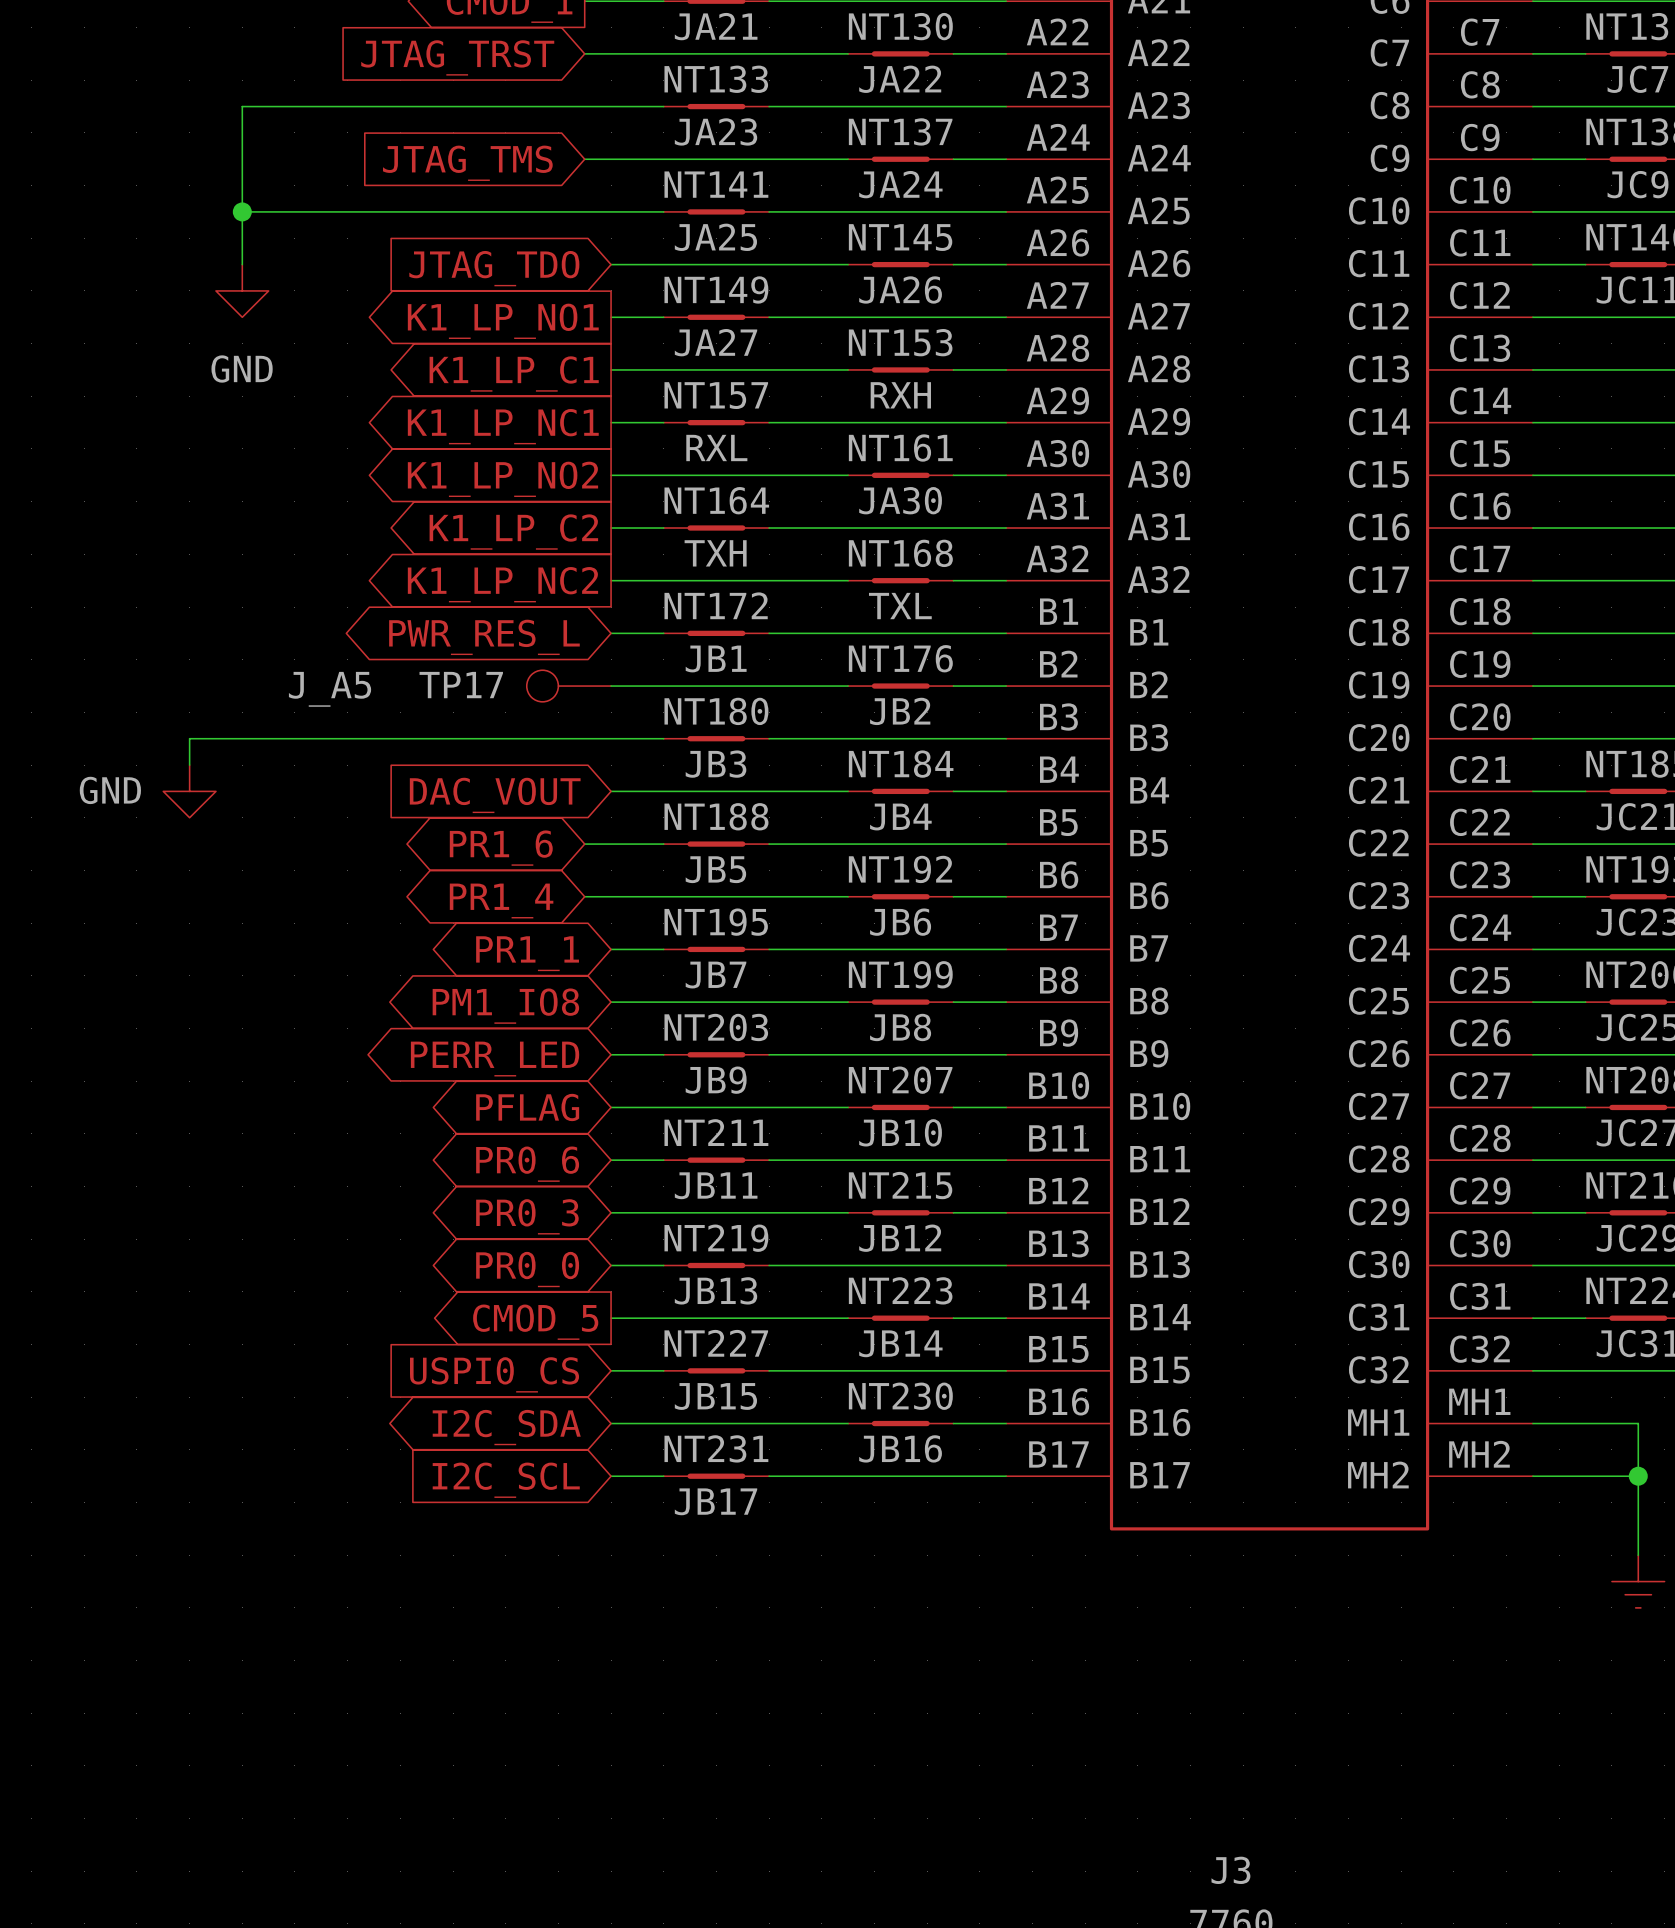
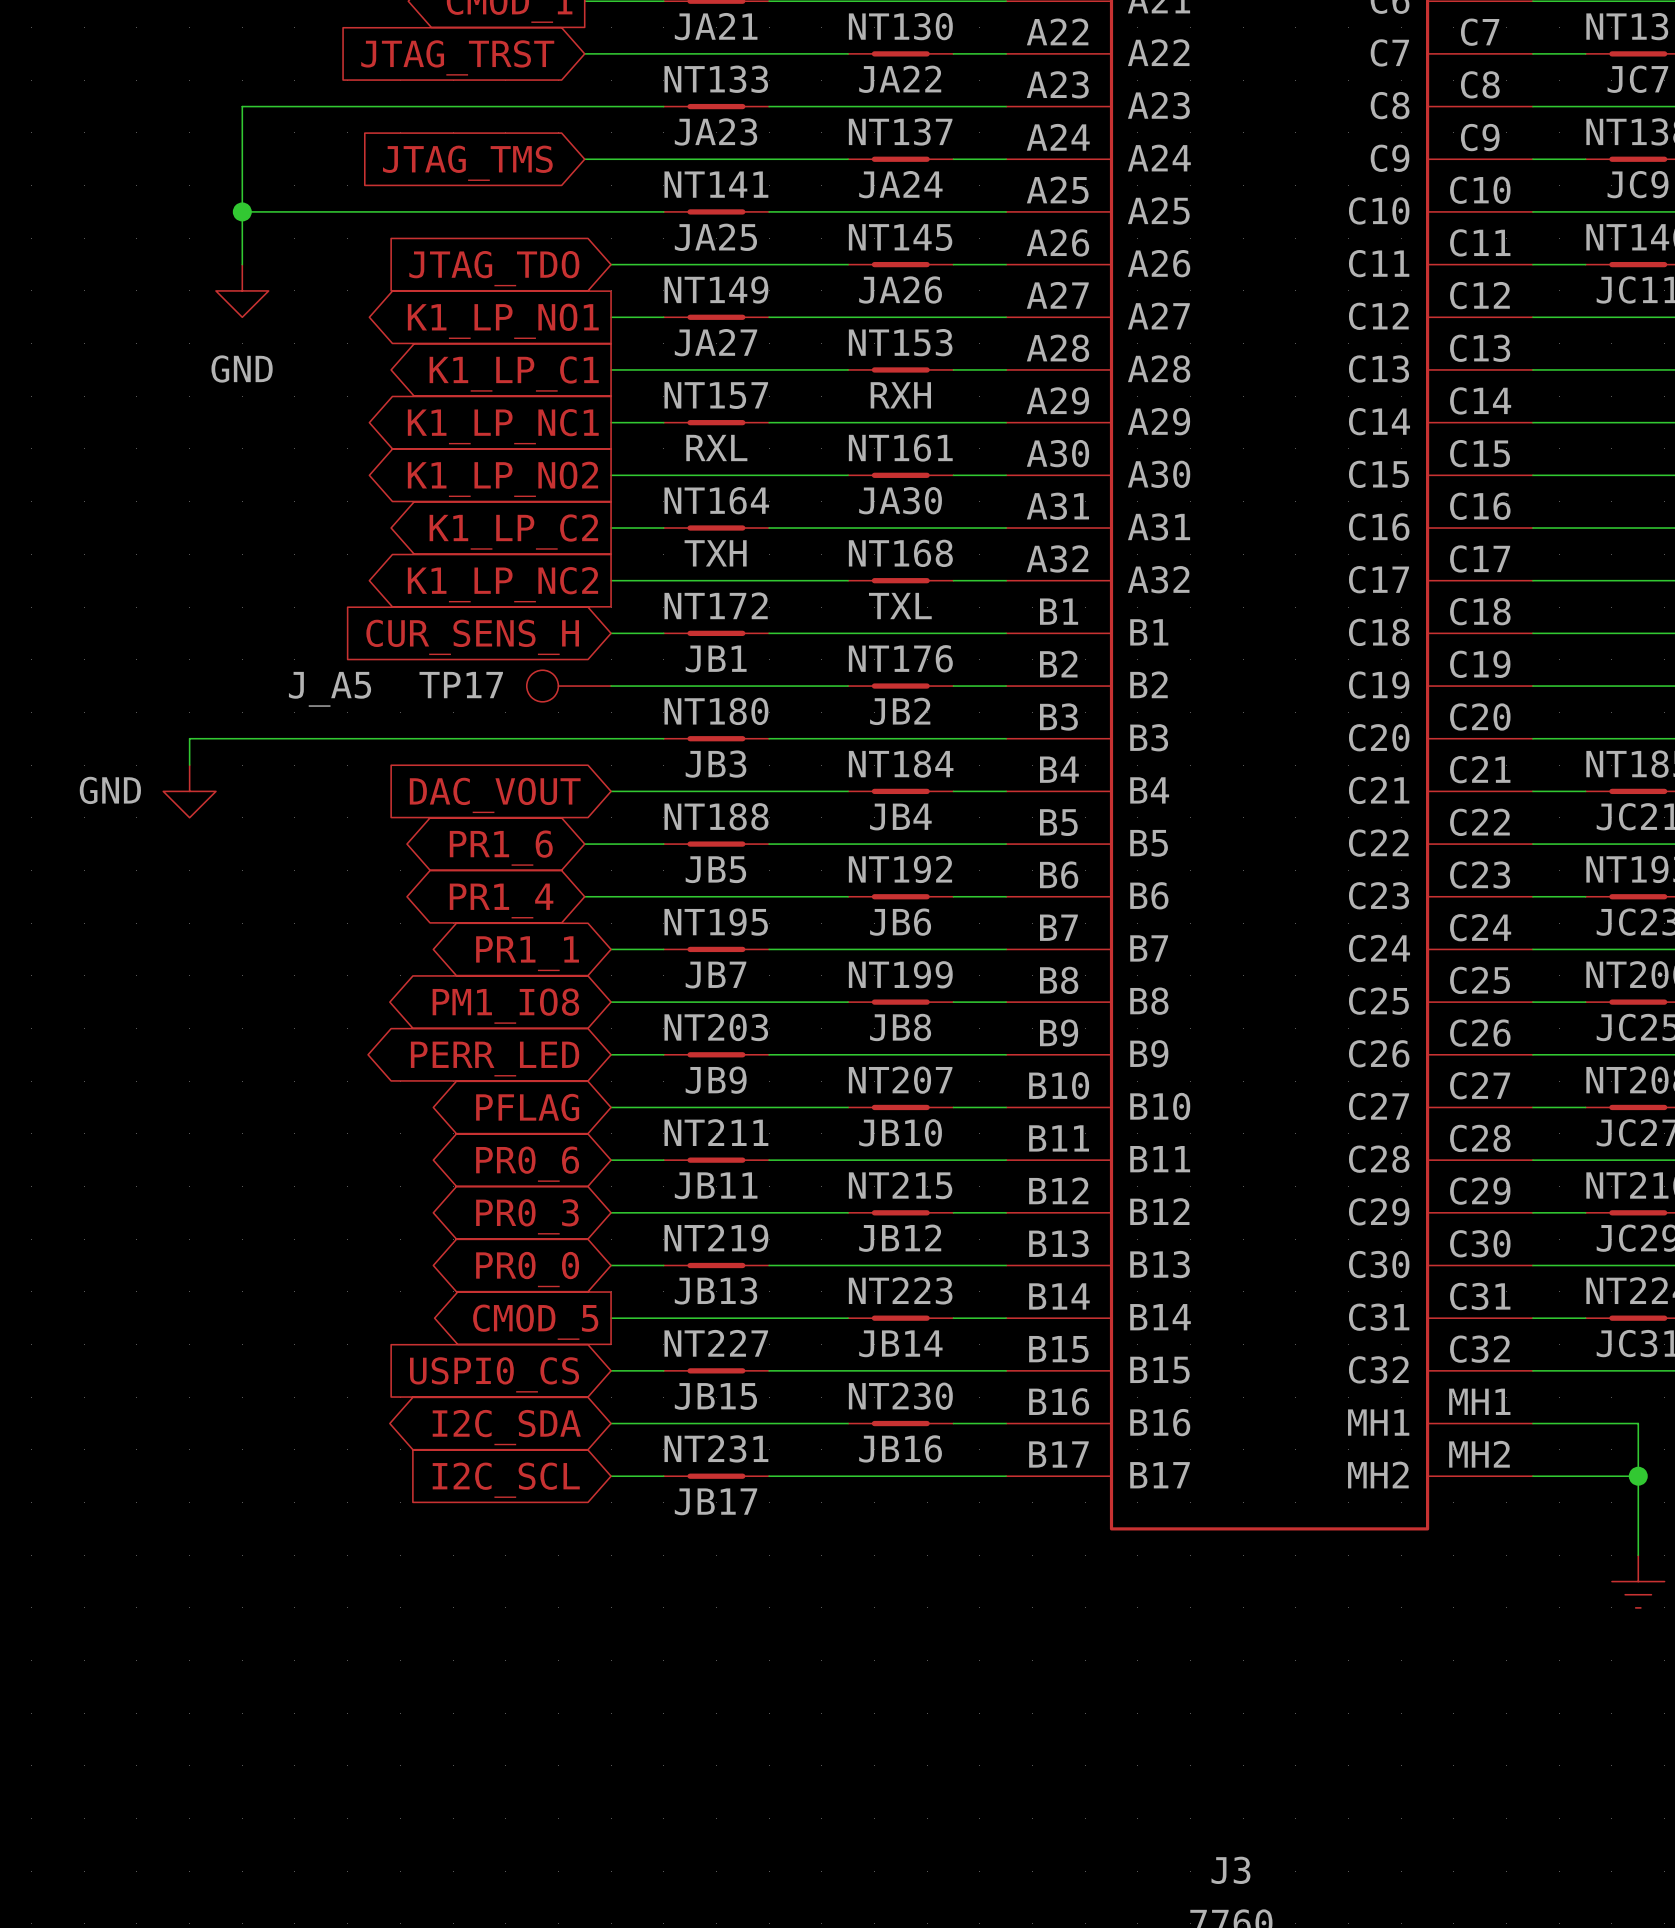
global label shape: bidirectional (484, 637) -> input (472, 637)
global label: PWR_RES_L (484, 637) -> CUR_SENS_H (472, 637)

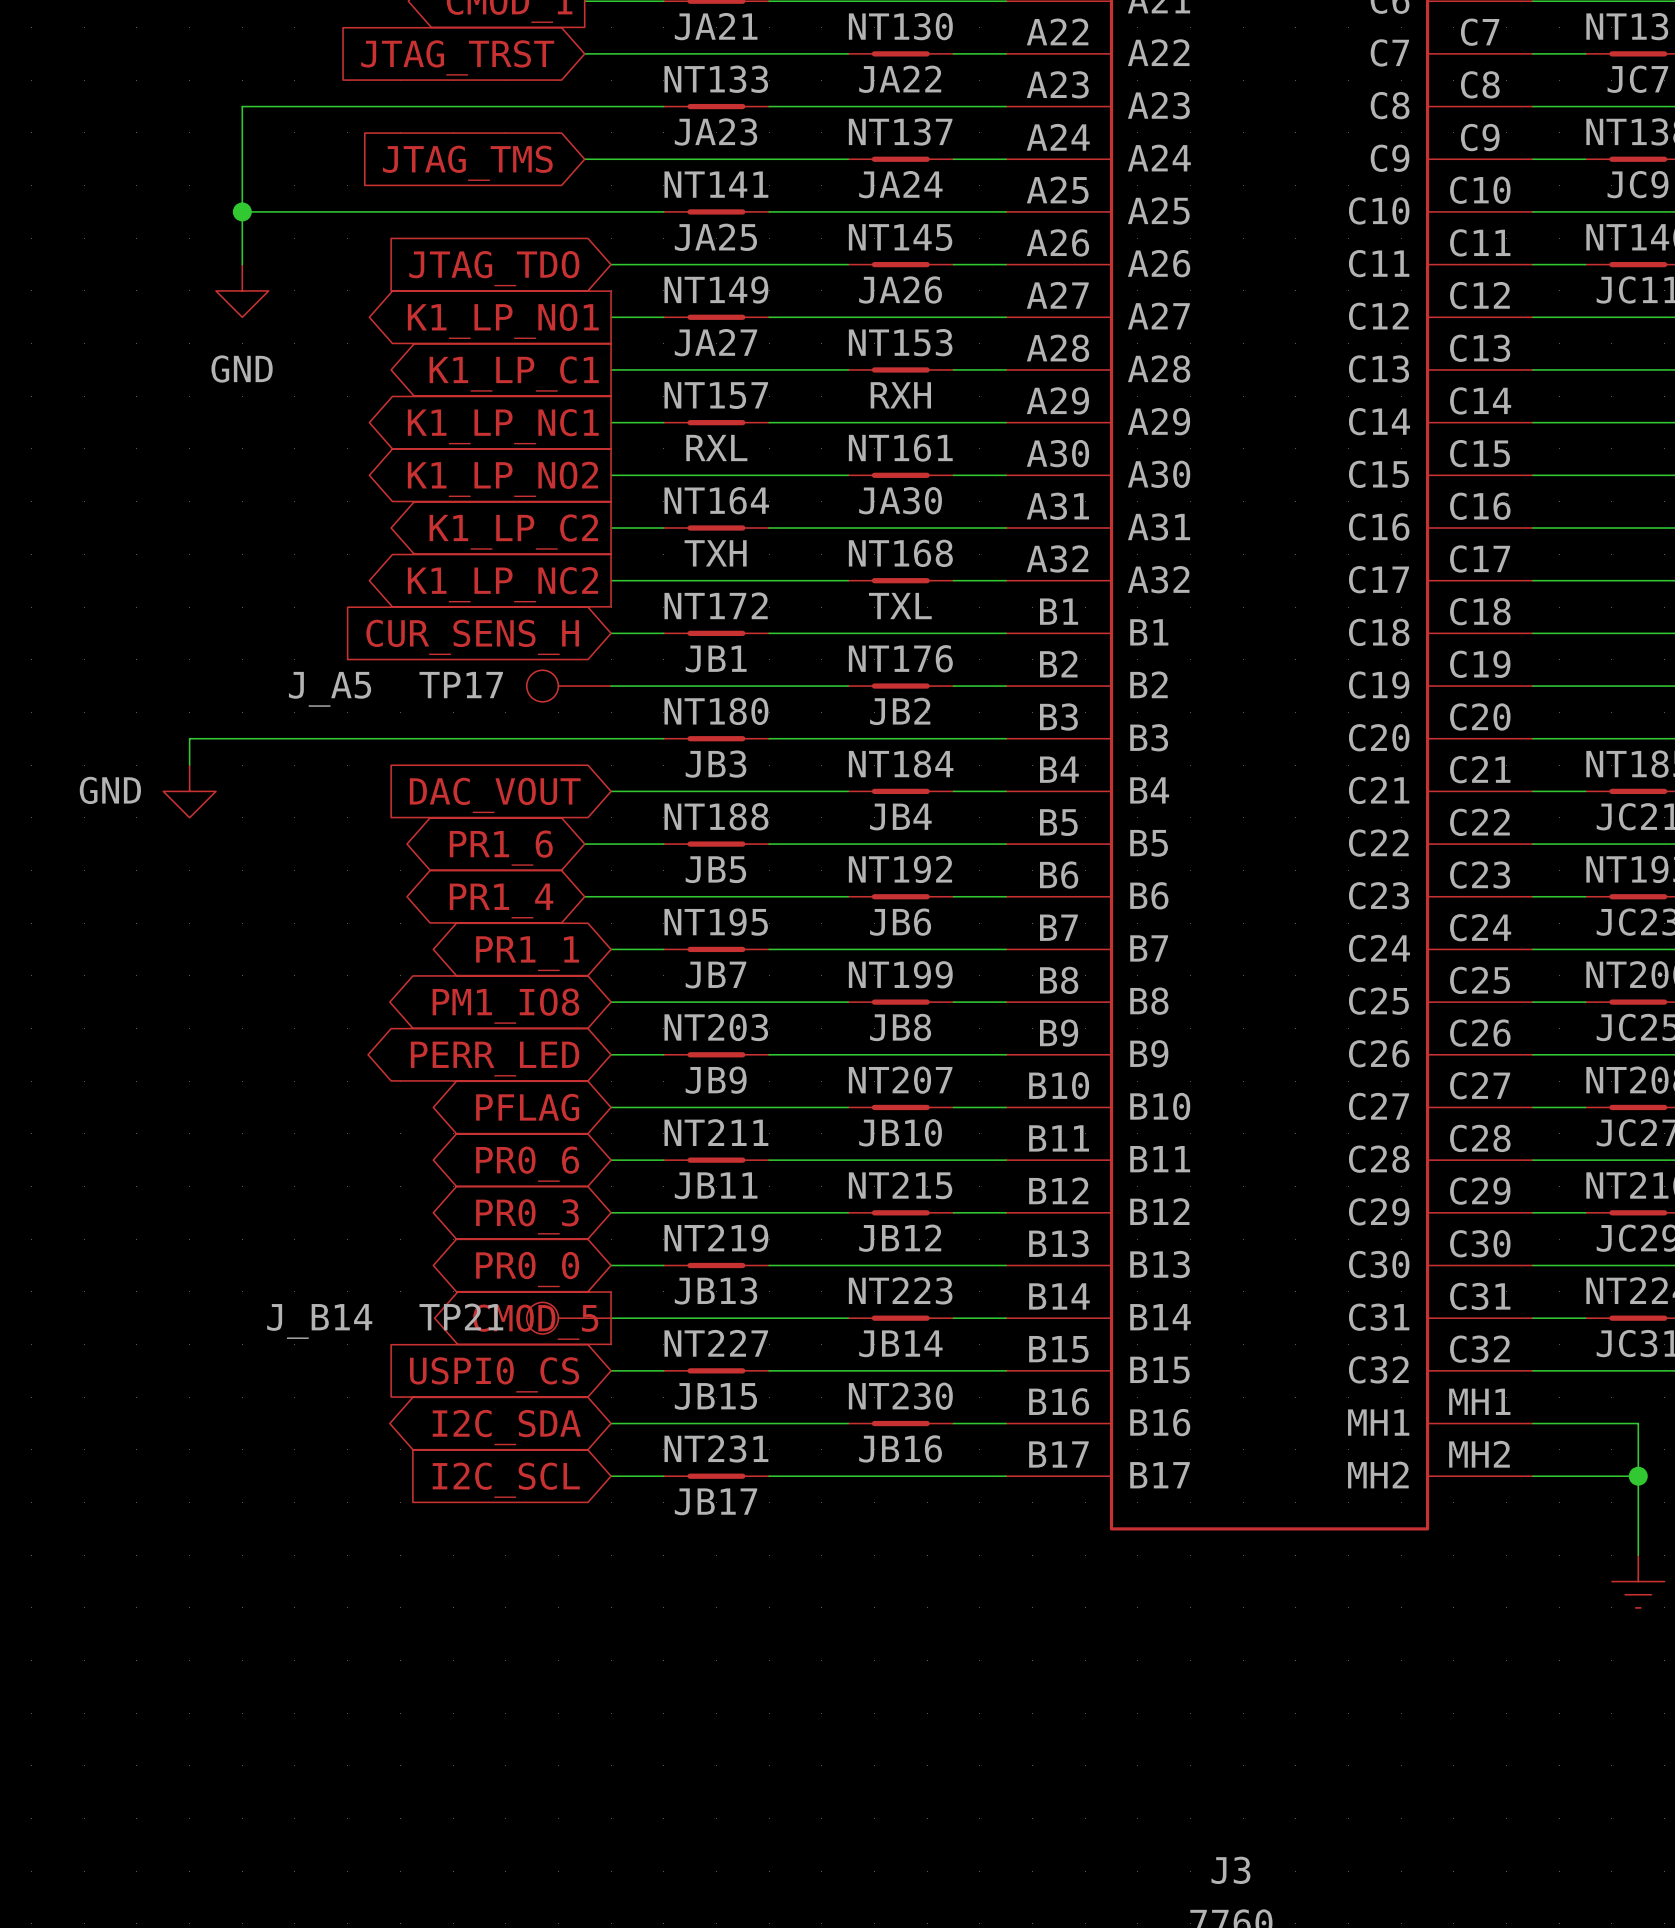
TP21: none -> J_B14 (568, 1318)

